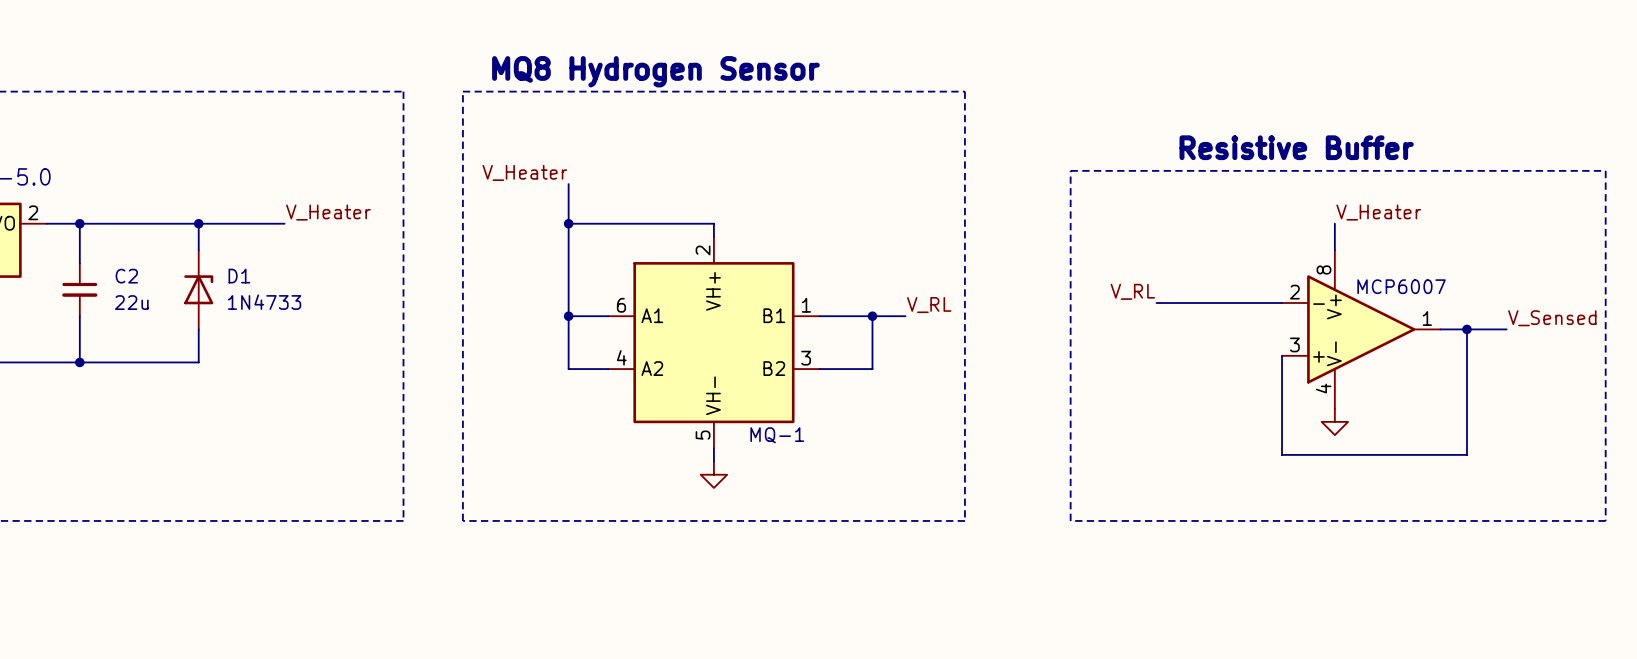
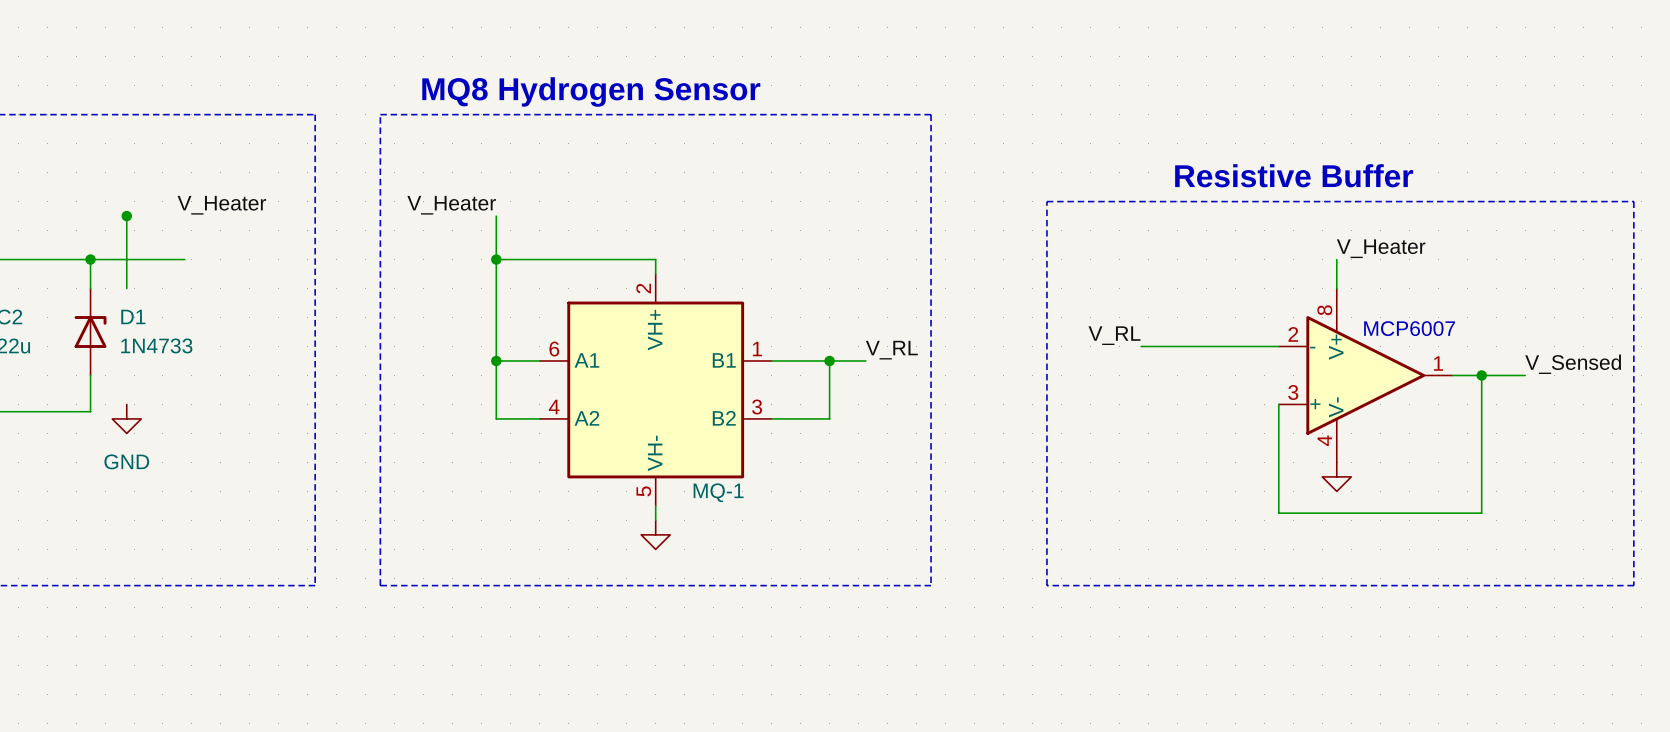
wire: none -> (126, 216) (126, 288)
junction: none -> (126, 216)
label position: V_Heater (328, 212) -> V_Heater (221, 205)
power symbol: none -> GND (126, 418)

